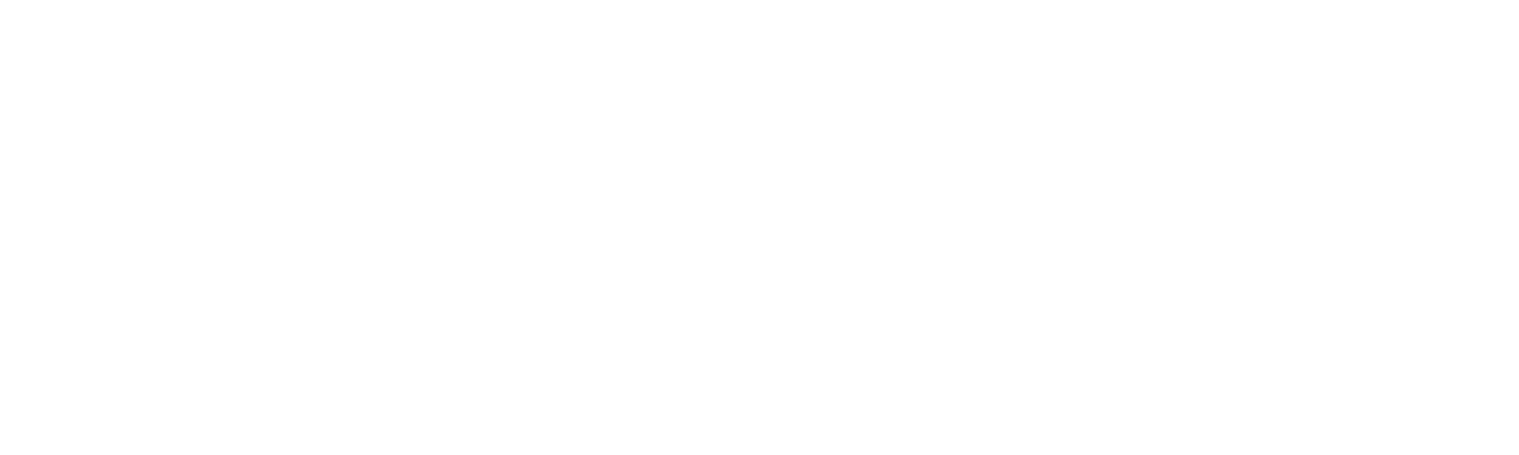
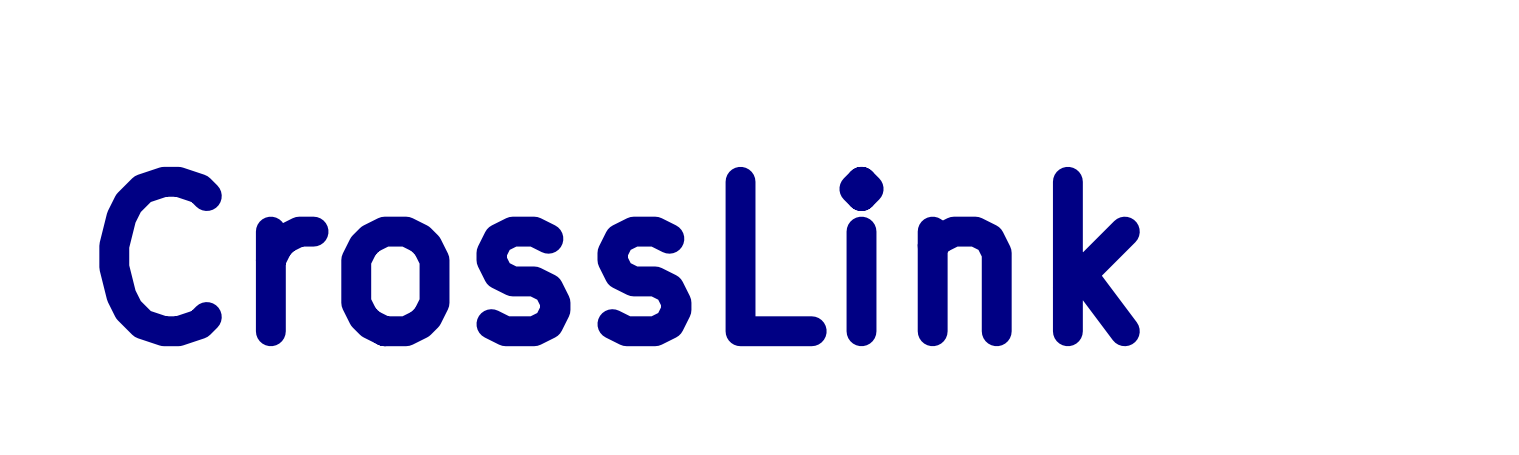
text: none -> CrossLink (619, 256)

